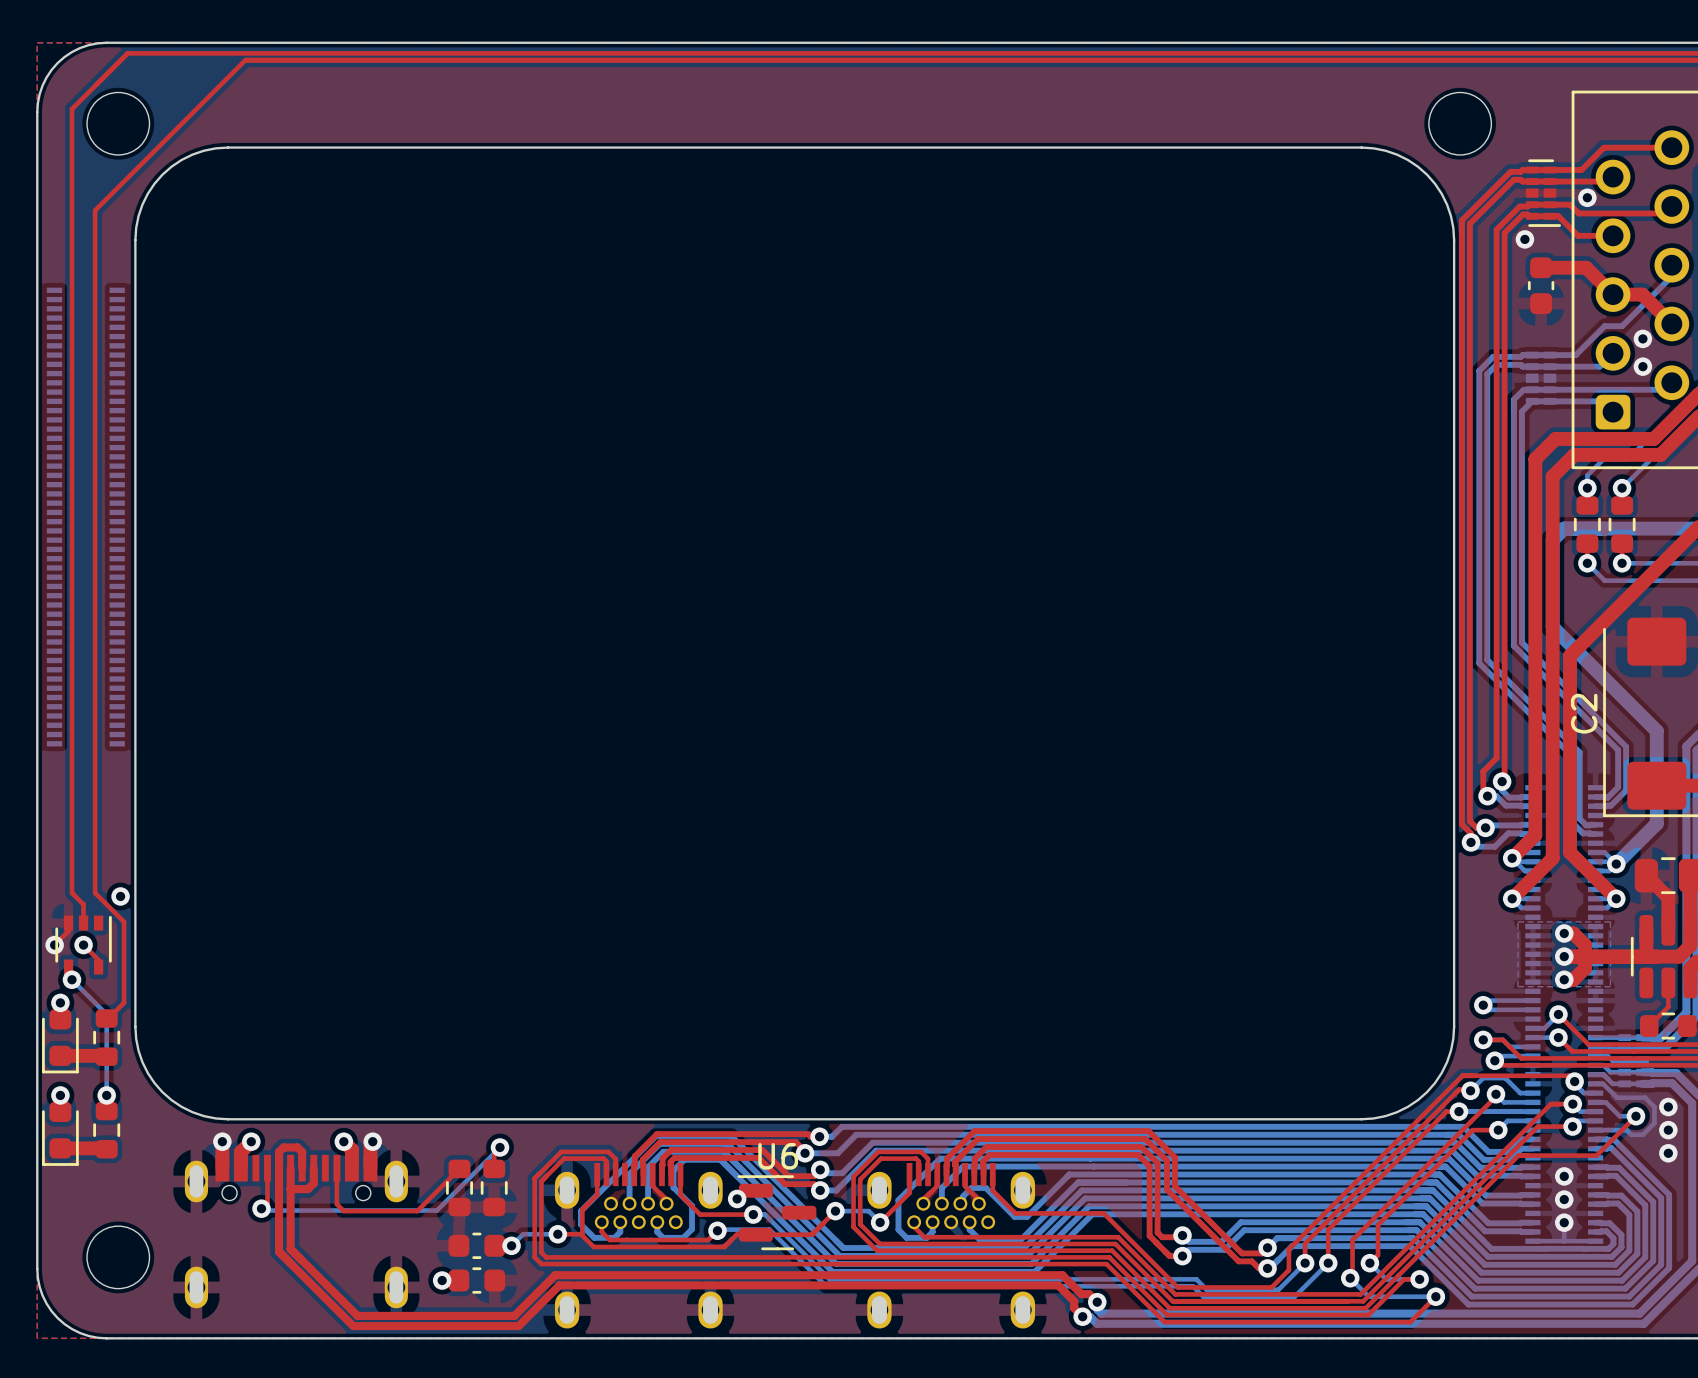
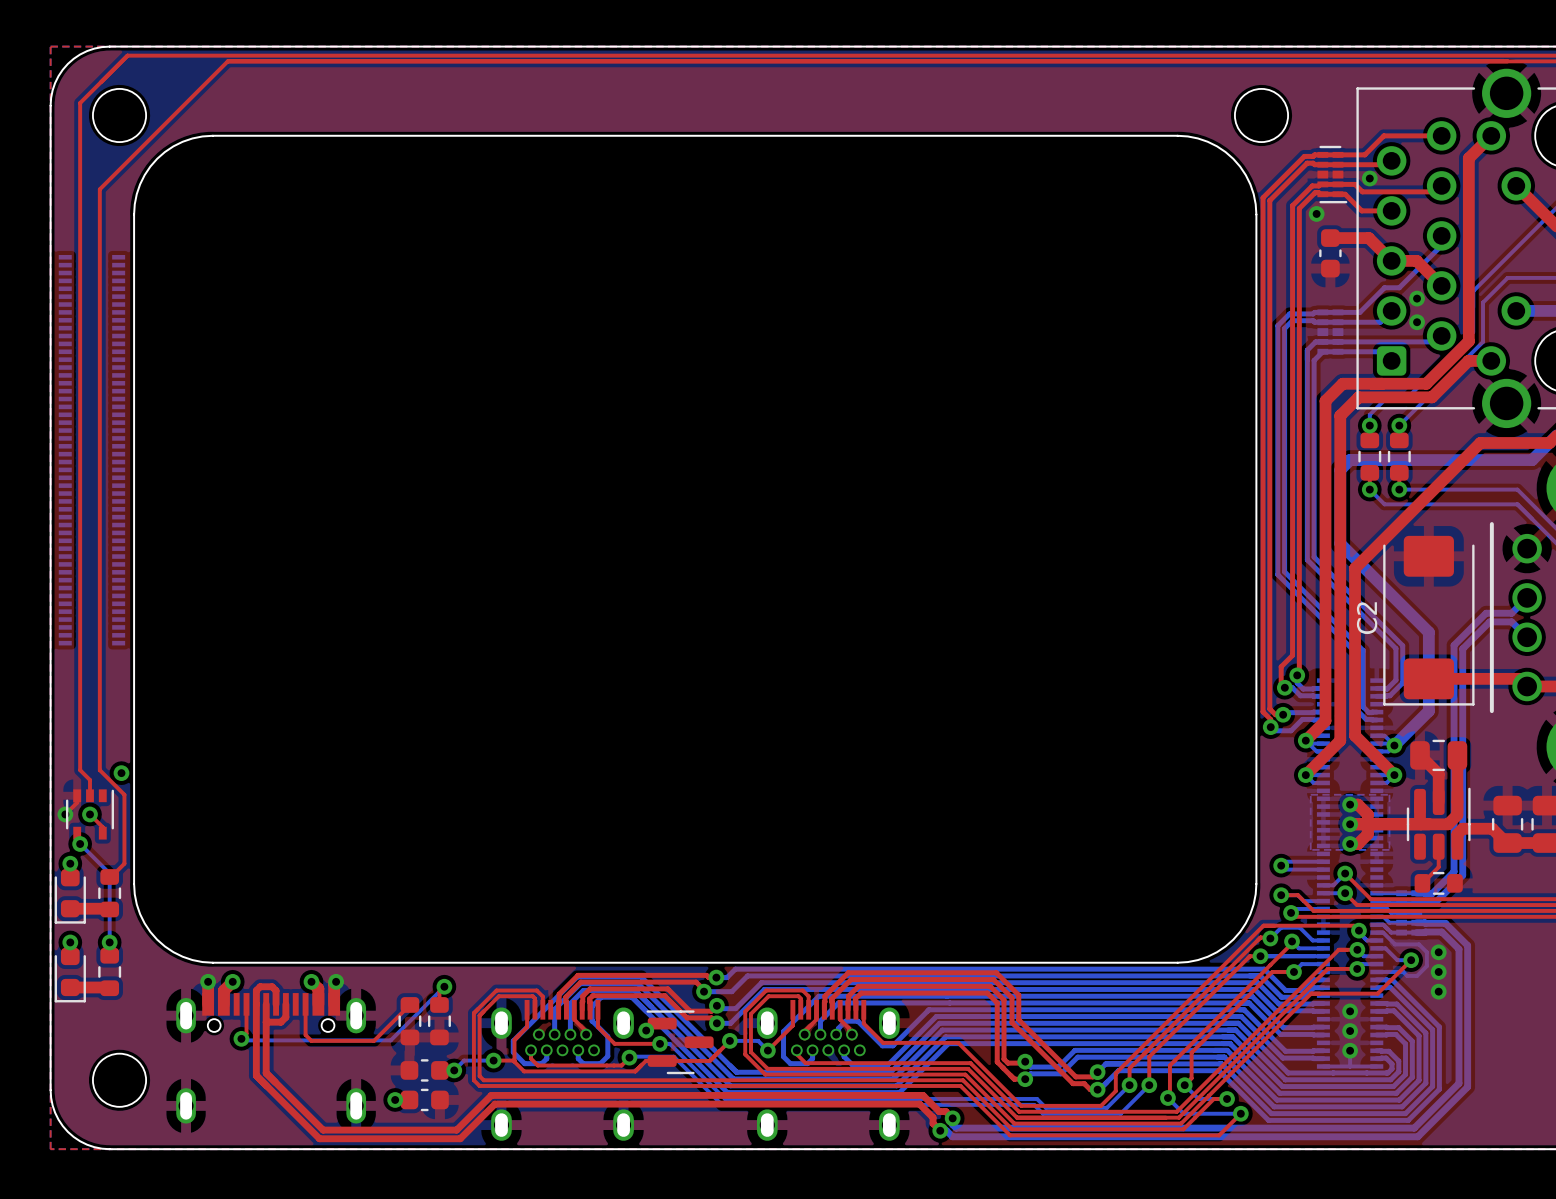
U6 name: U6 (778, 1156) -> none

